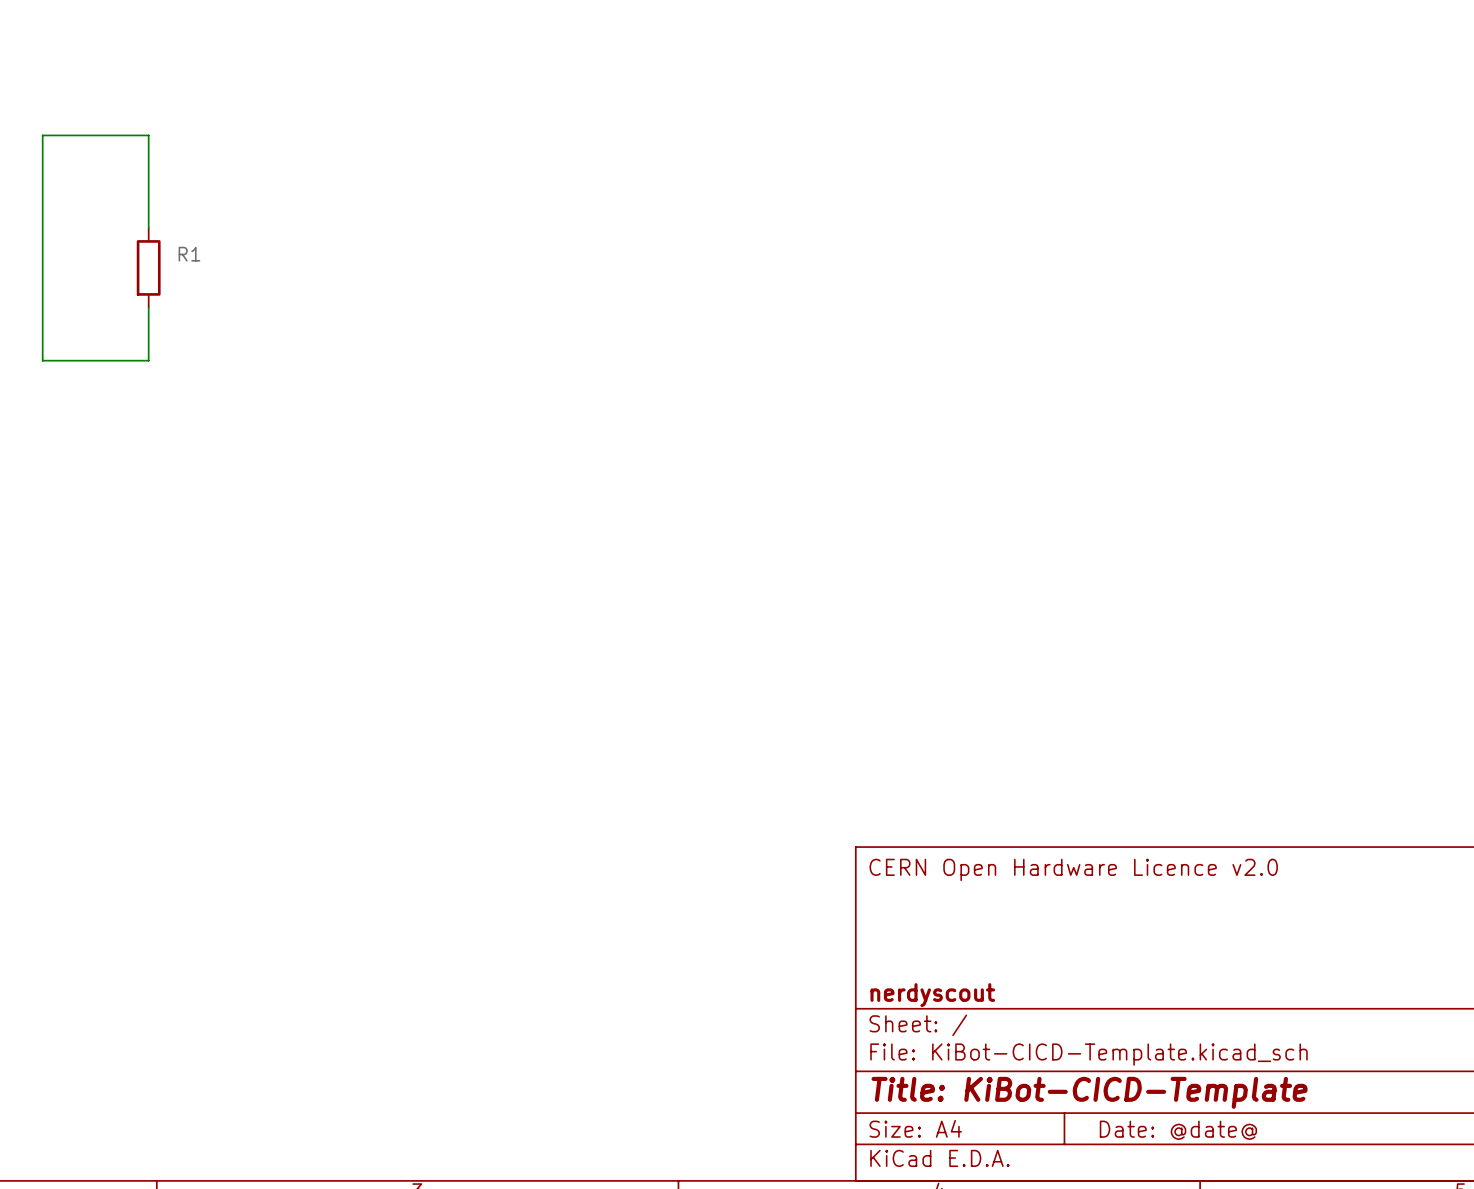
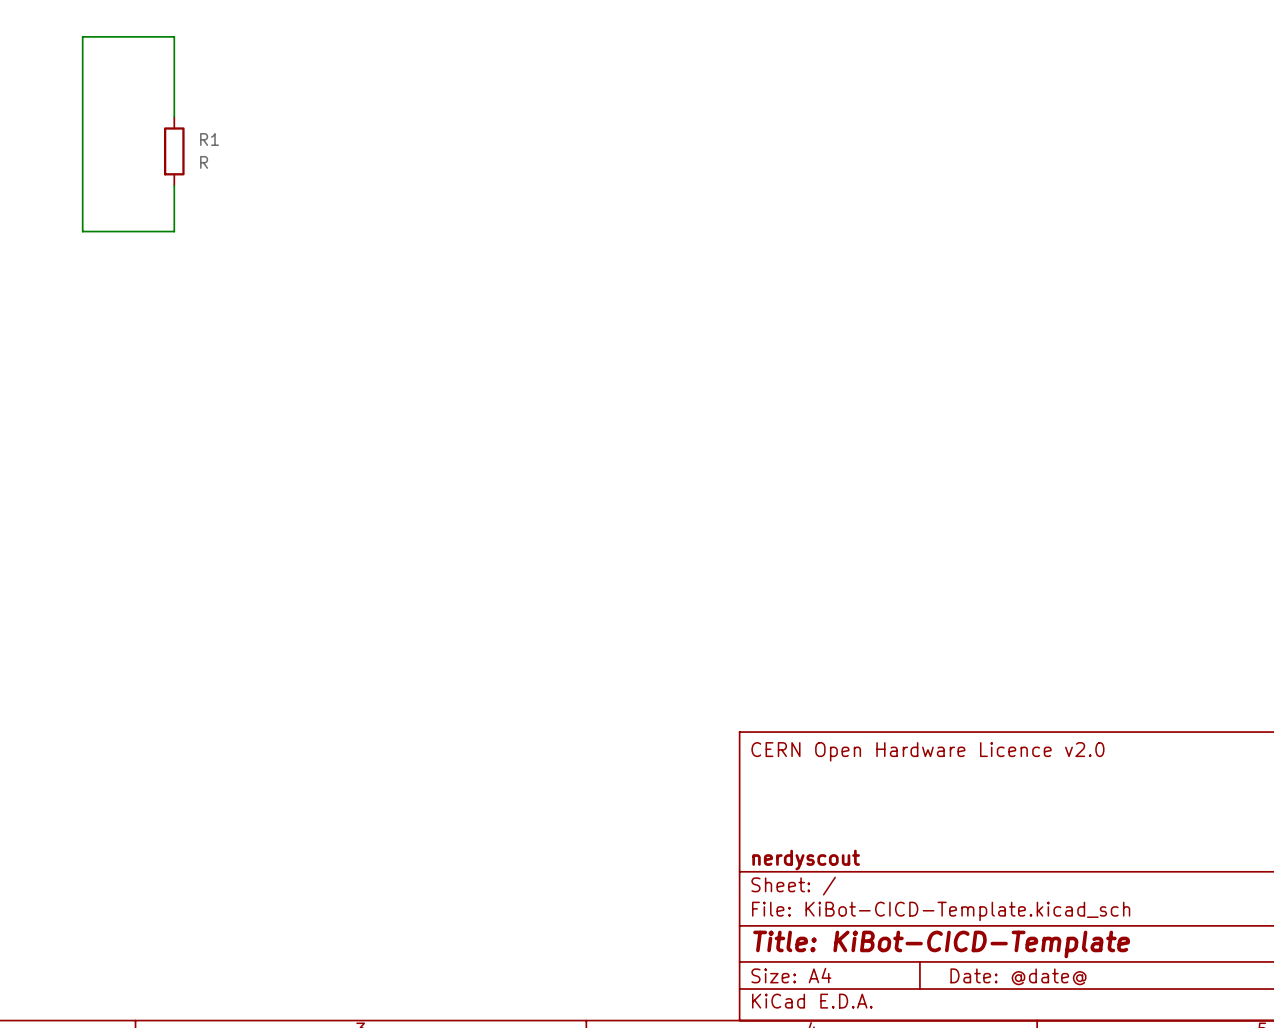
R1 value: none -> R (204, 162)
wire: (148, 228) (148, 135) (42, 135) (42, 360) (148, 360) (148, 307) -> (174, 117) (174, 36) (82, 36) (82, 231) (174, 231) (174, 185)
R1 position: (148, 267) -> (174, 151)

